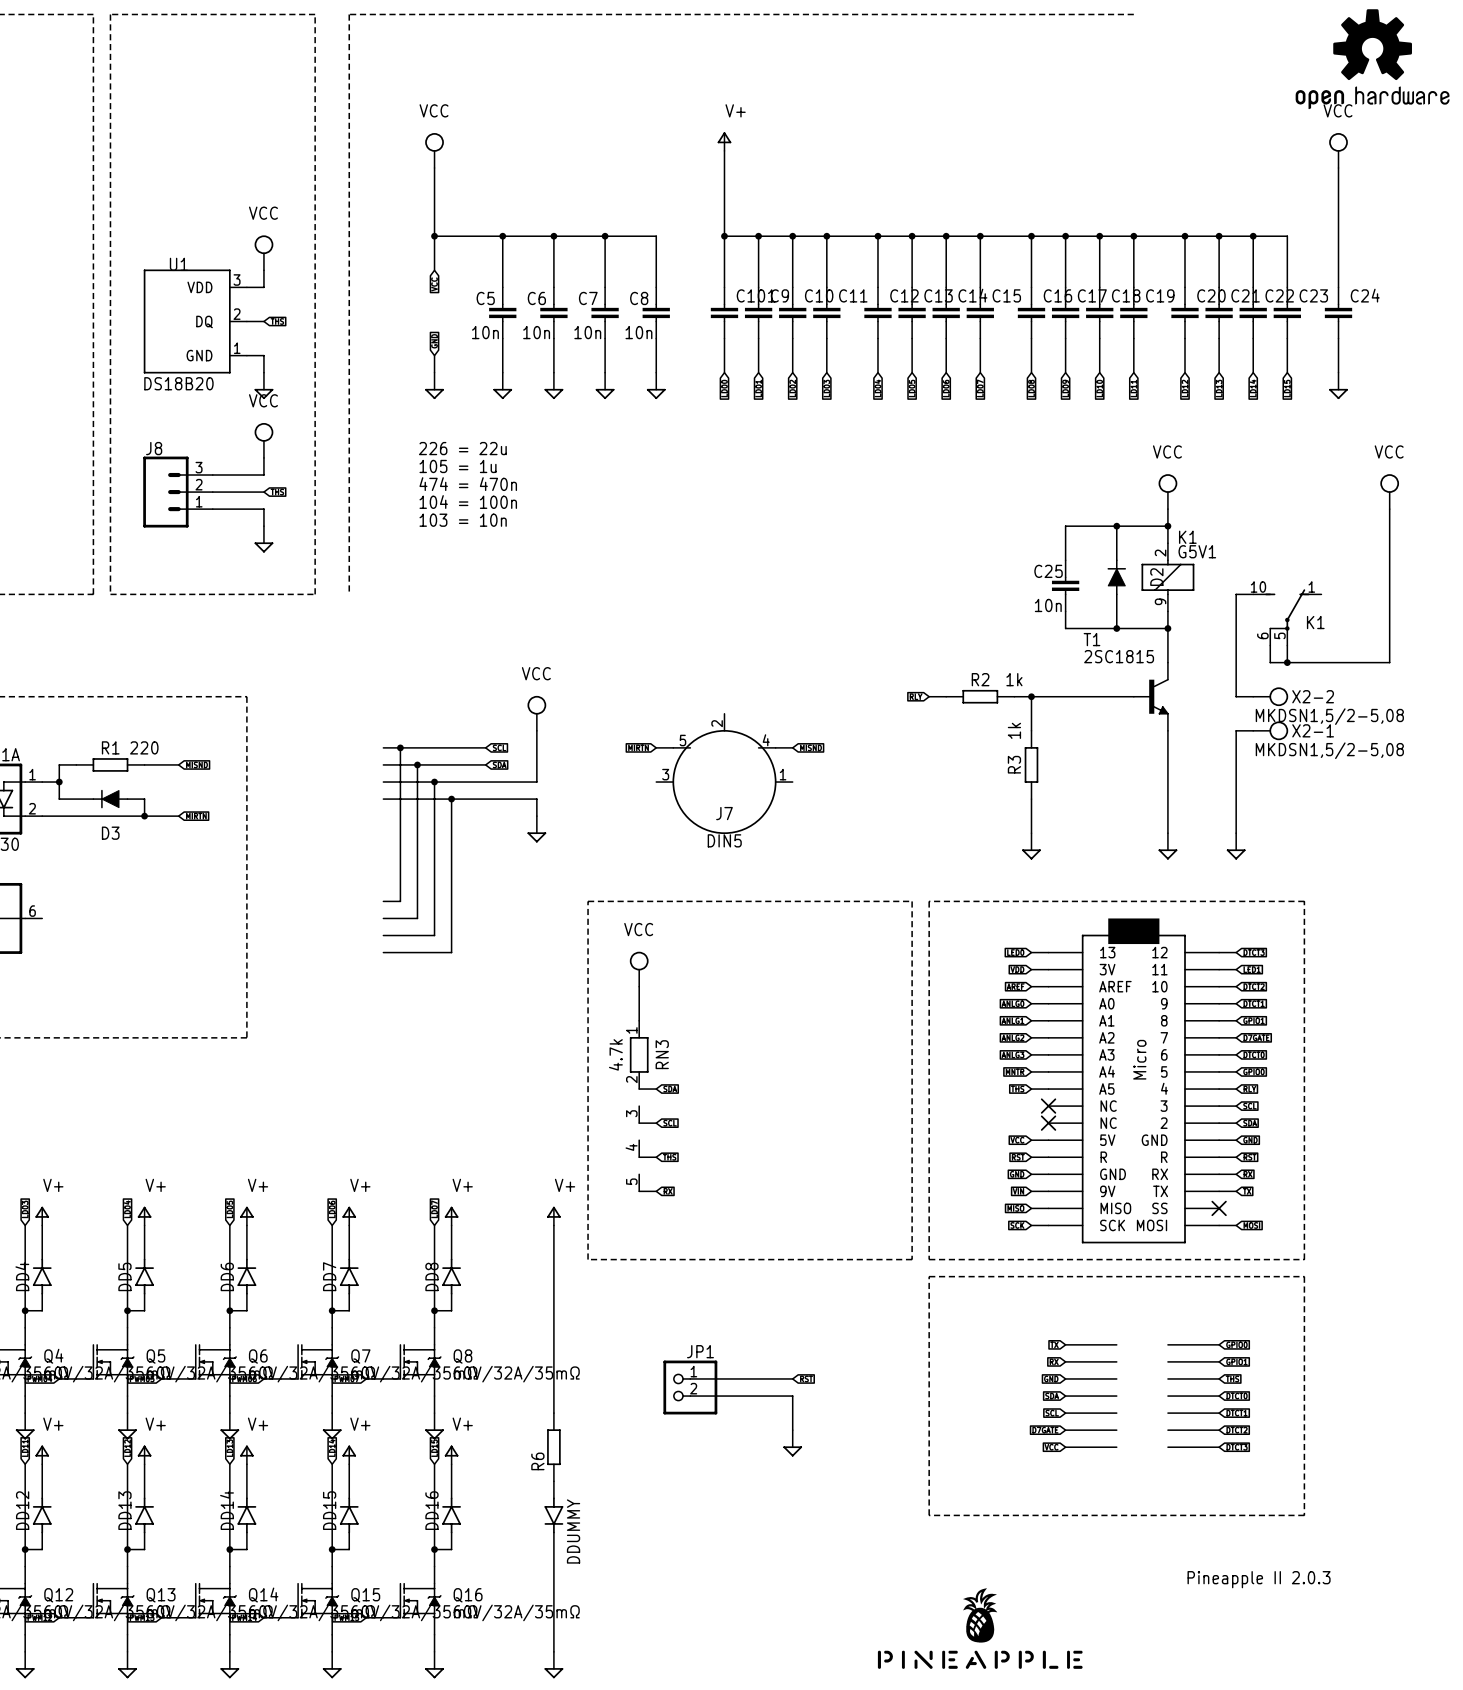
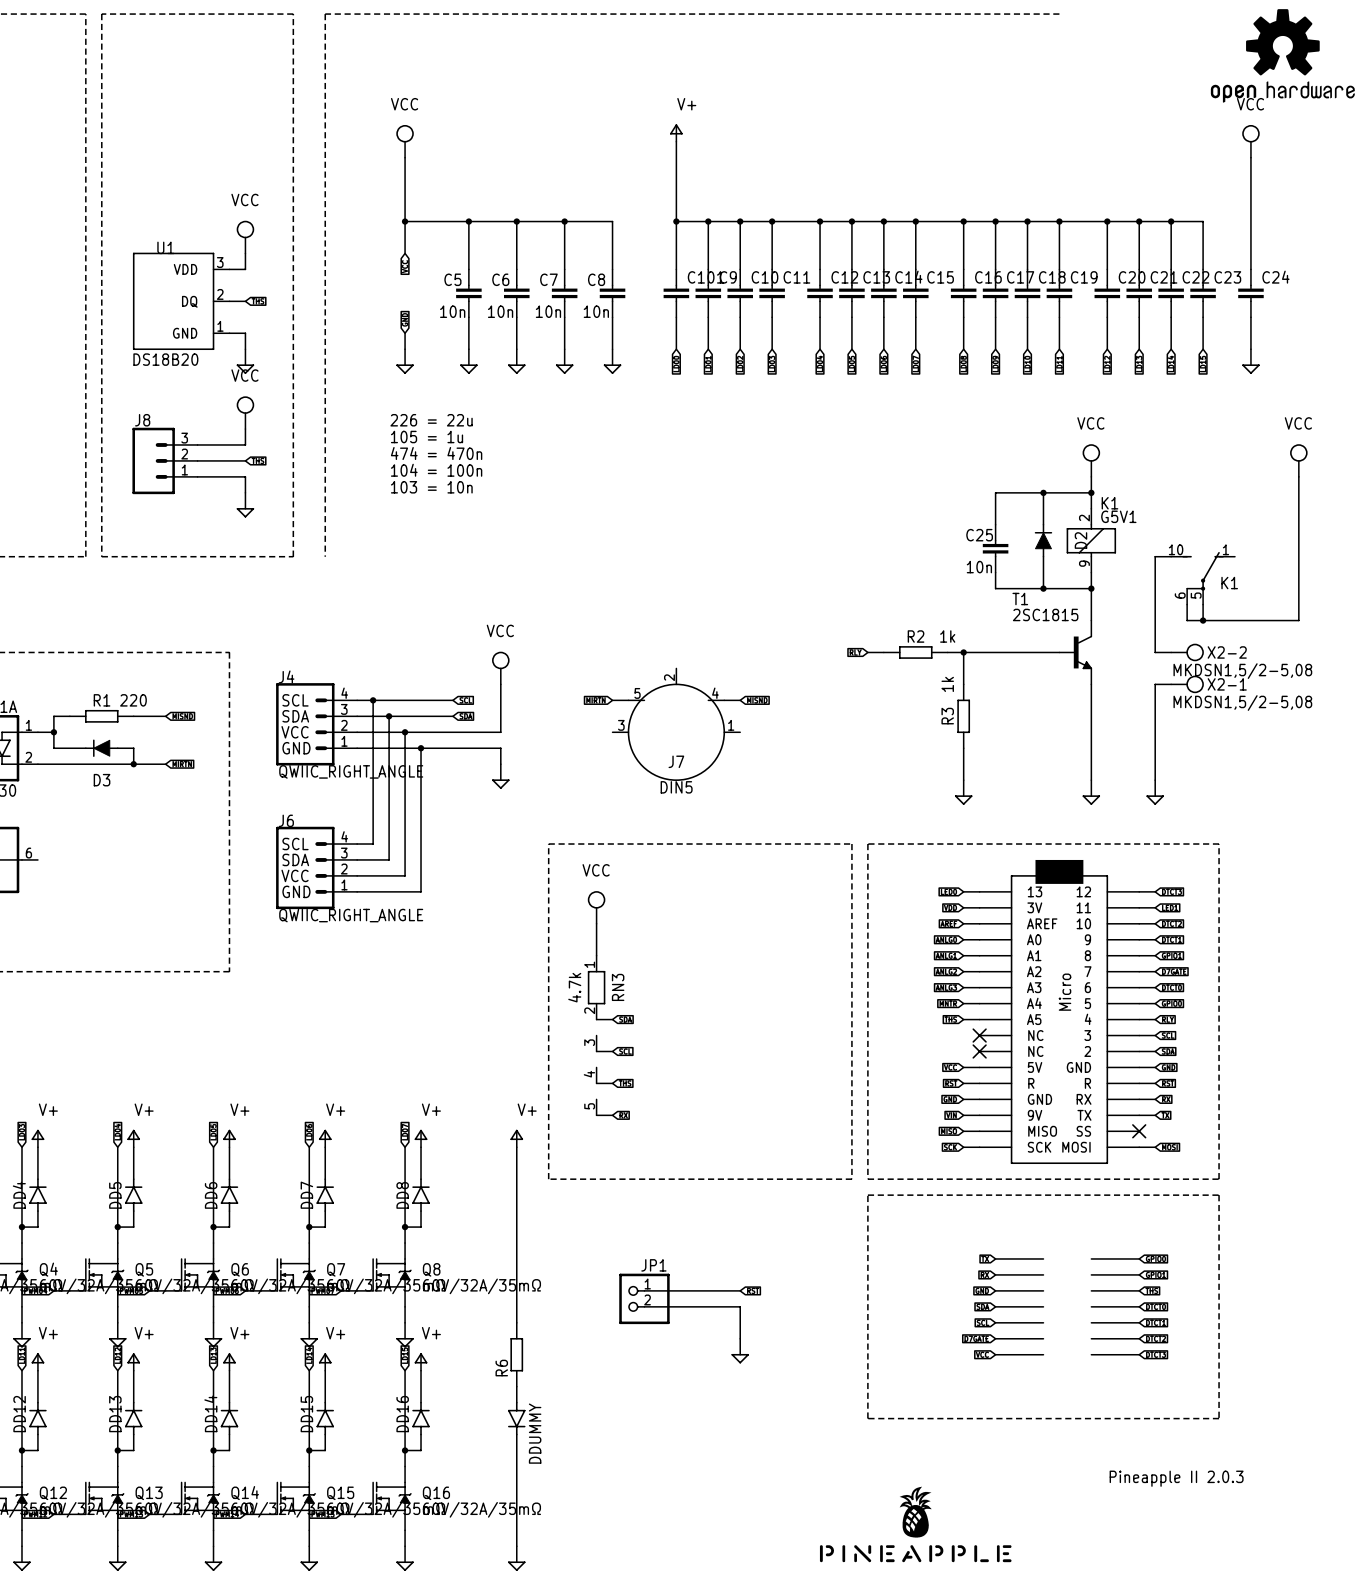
J4: none -> QWIIC_RIGHT_ANGLE (316, 724)
J6: none -> QWIIC_RIGHT_ANGLE (316, 867)

